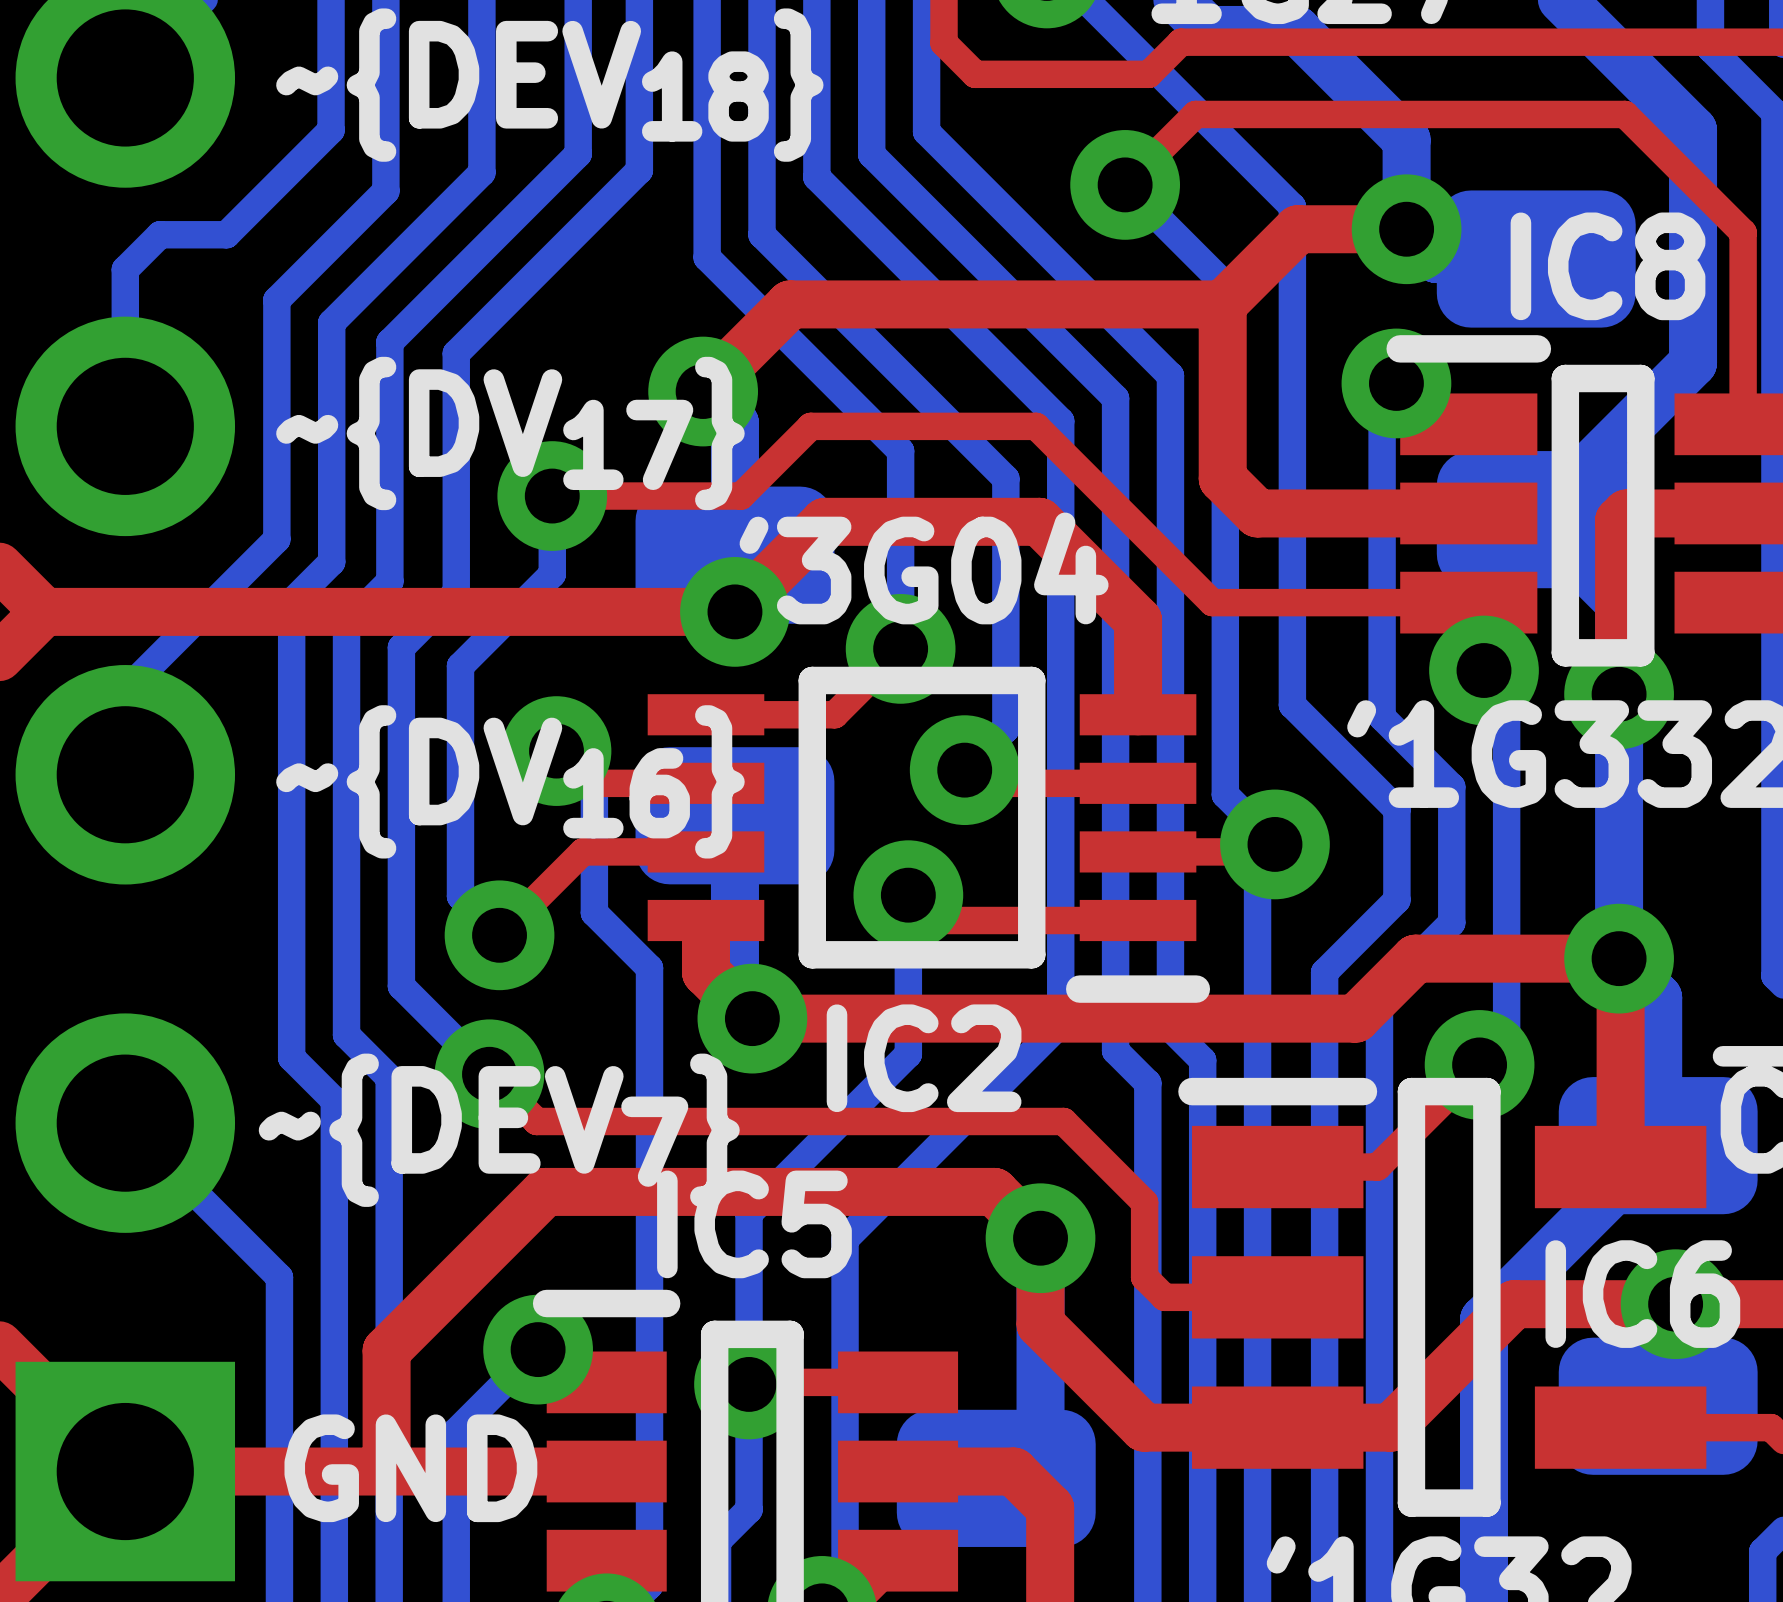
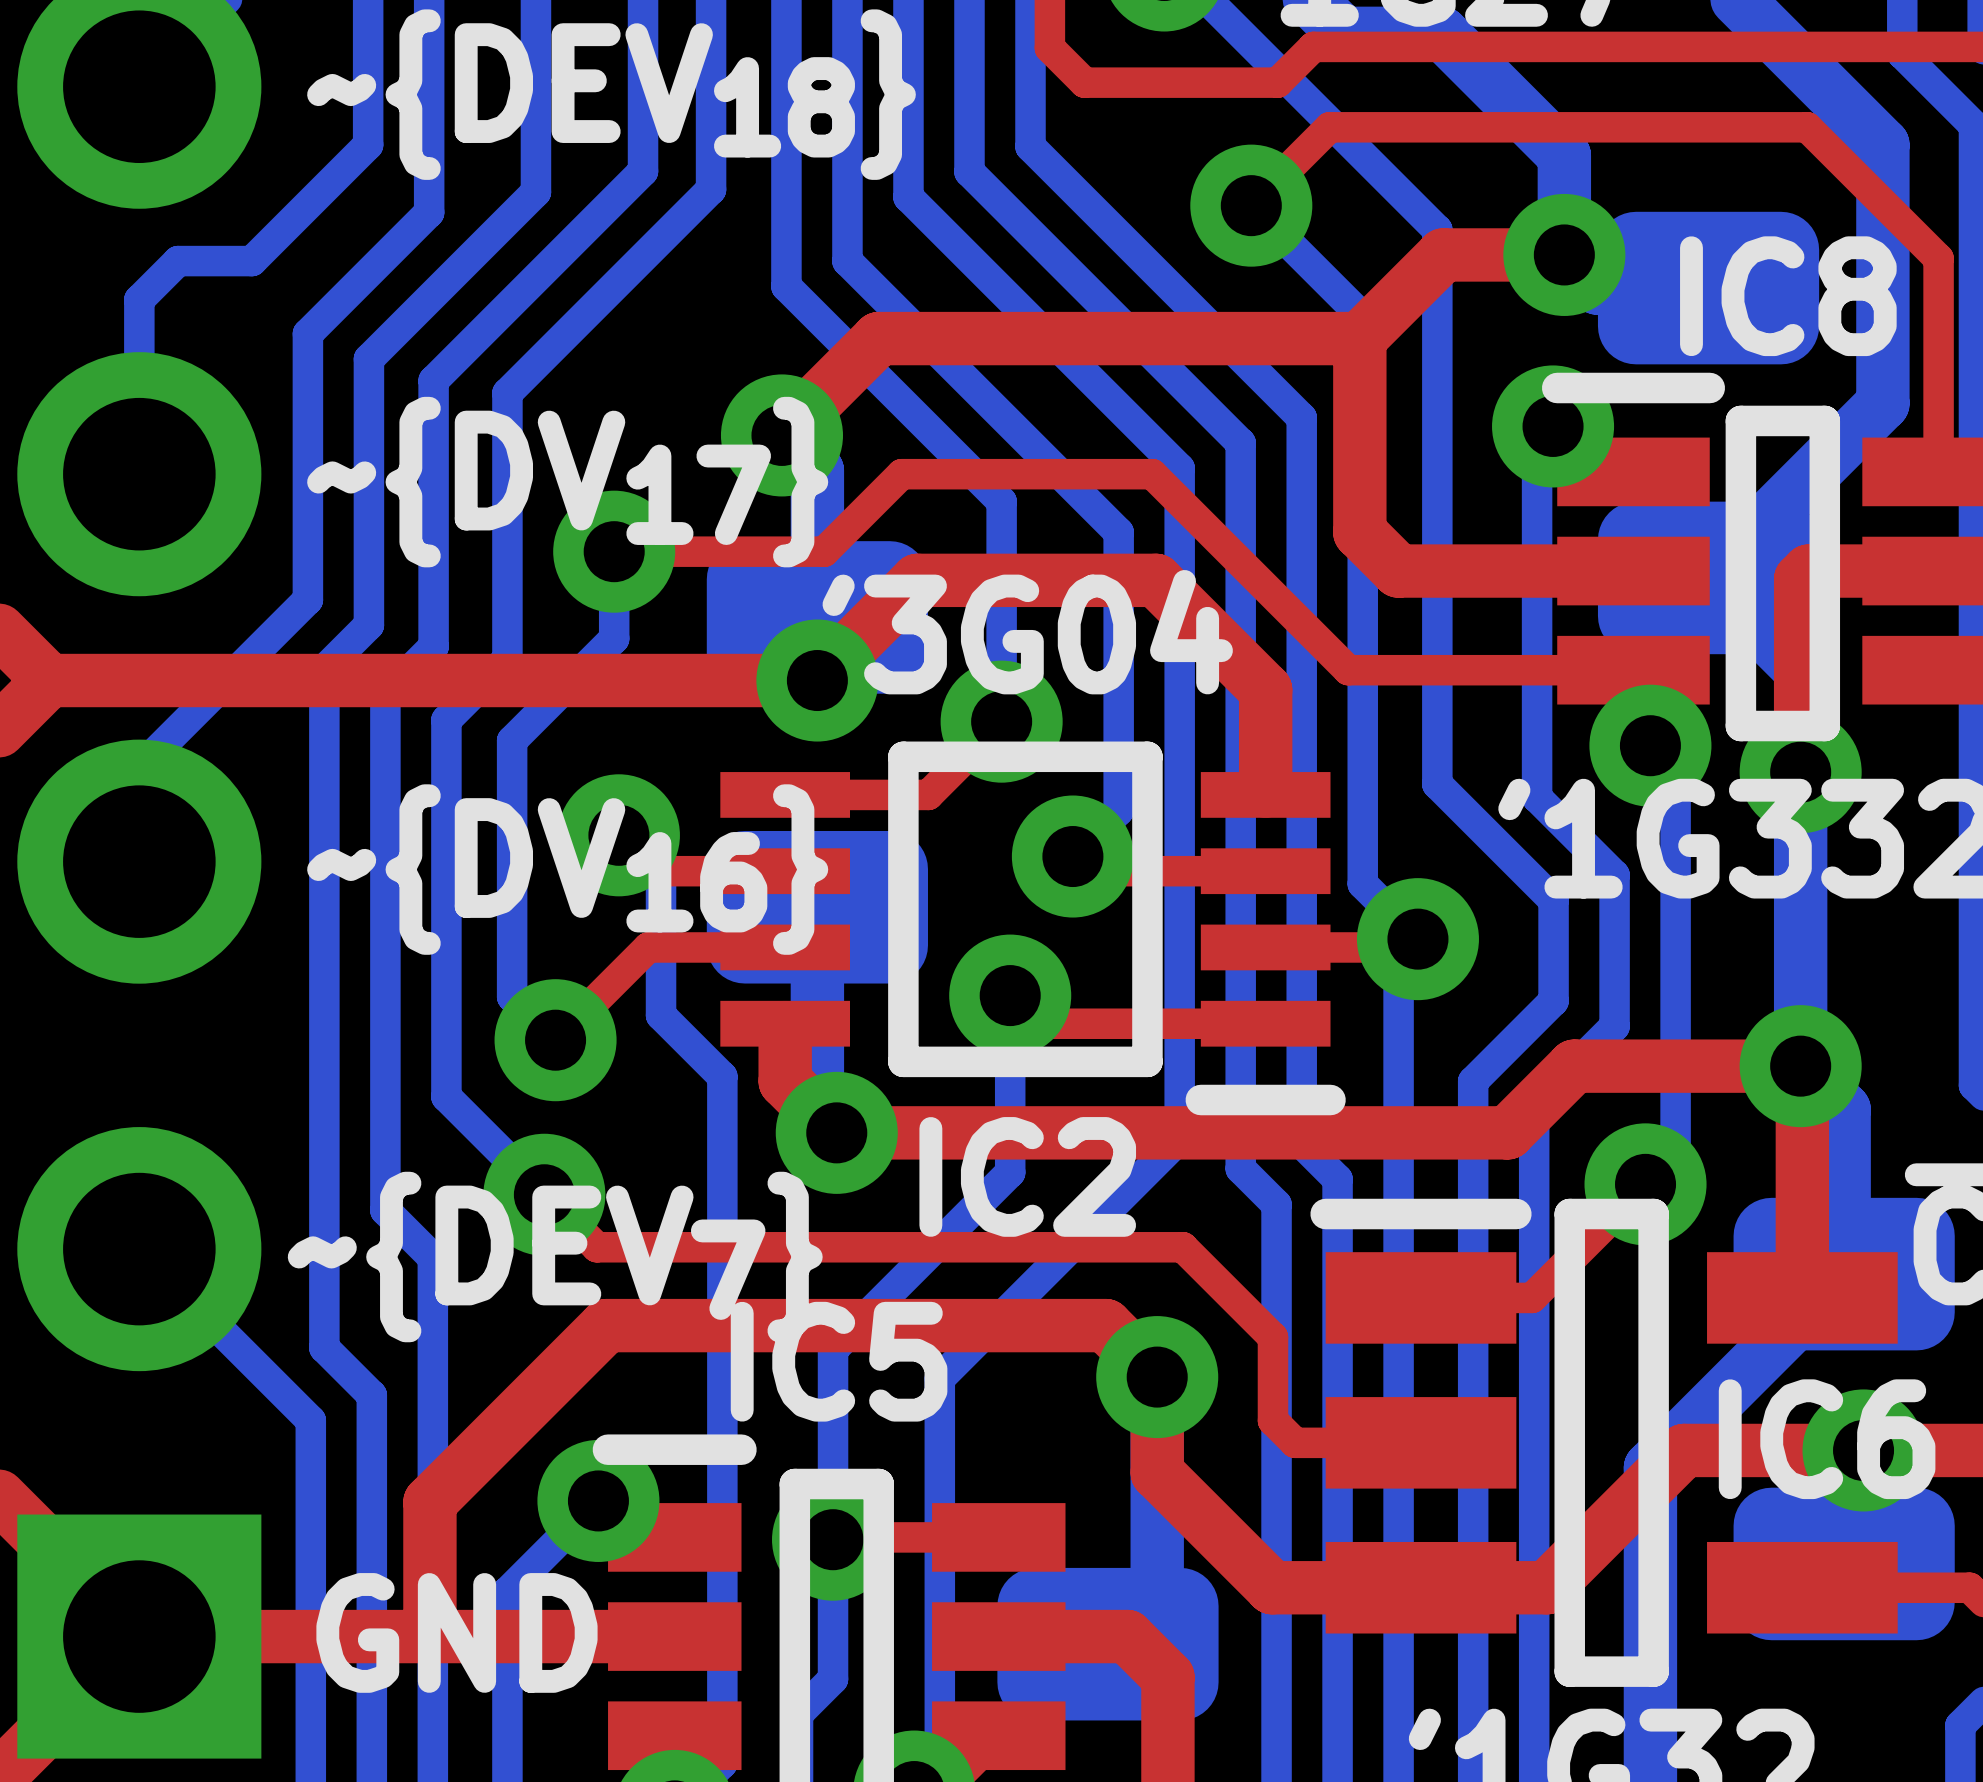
bottom track: (346, 1035) (389, 1077) (389, 1130) -> (385, 1151) (385, 1210) (432, 1257)
bottom track: (291, 1057) (334, 1100) (334, 1254) -> (324, 1176) (324, 1347) (371, 1395)

